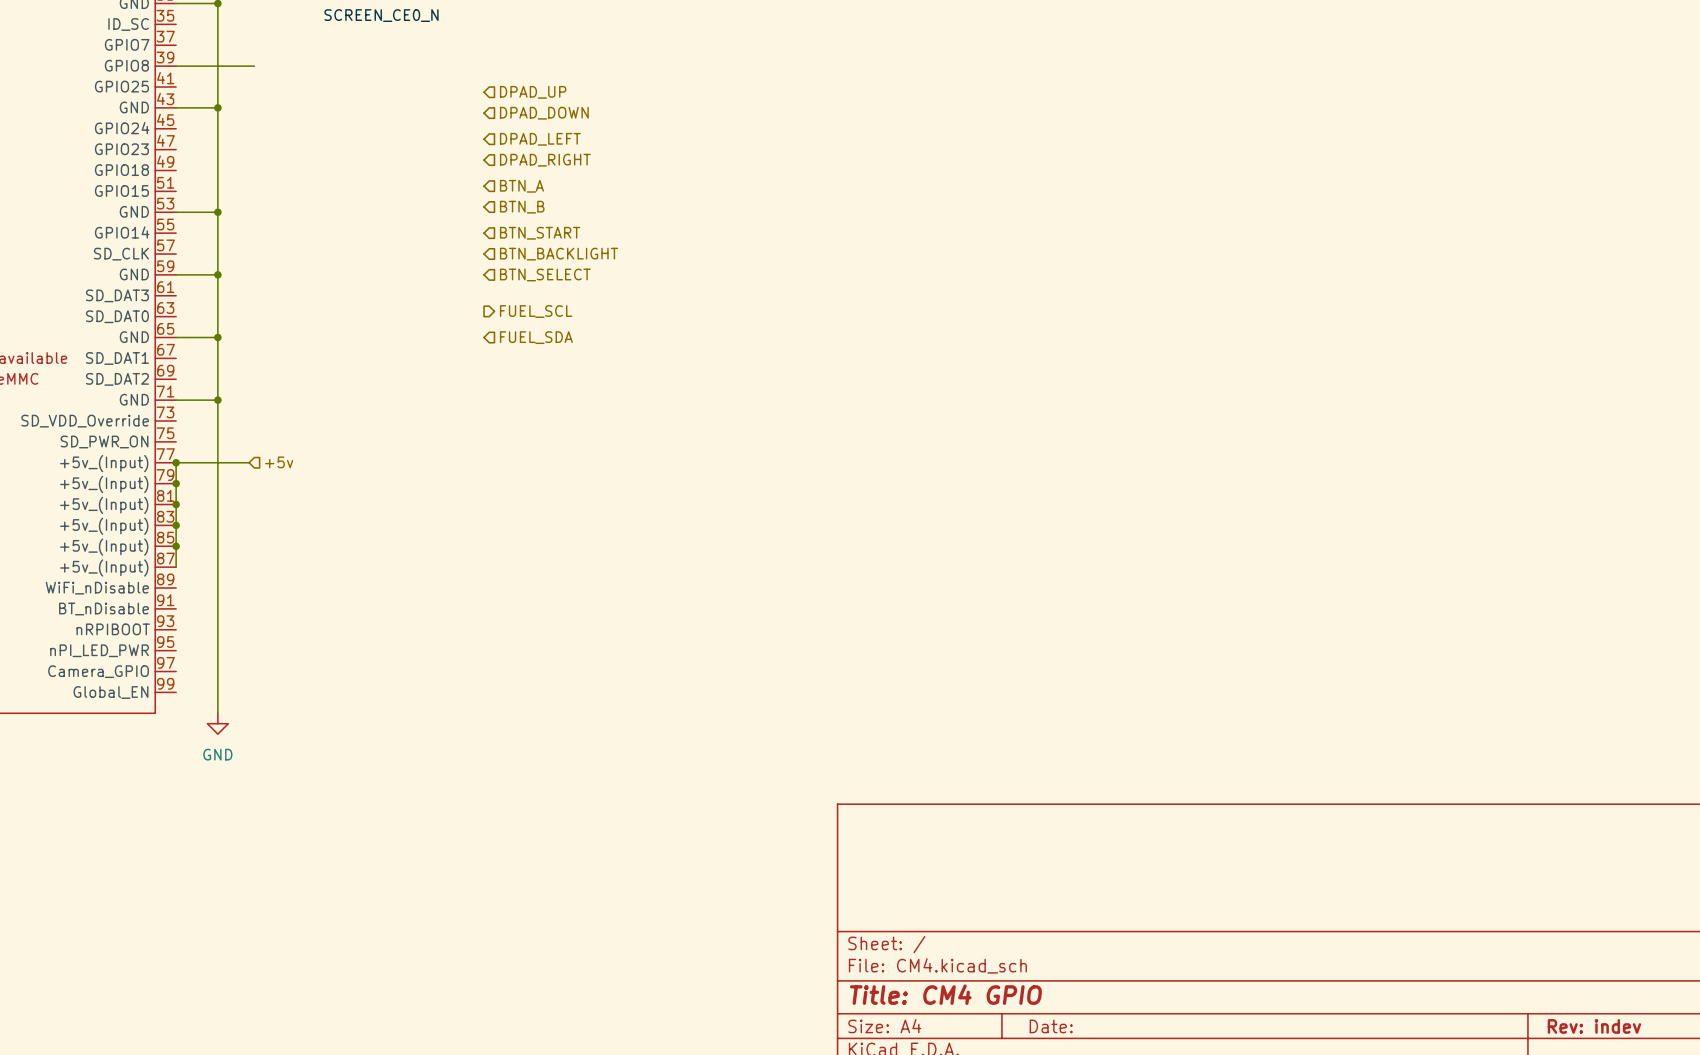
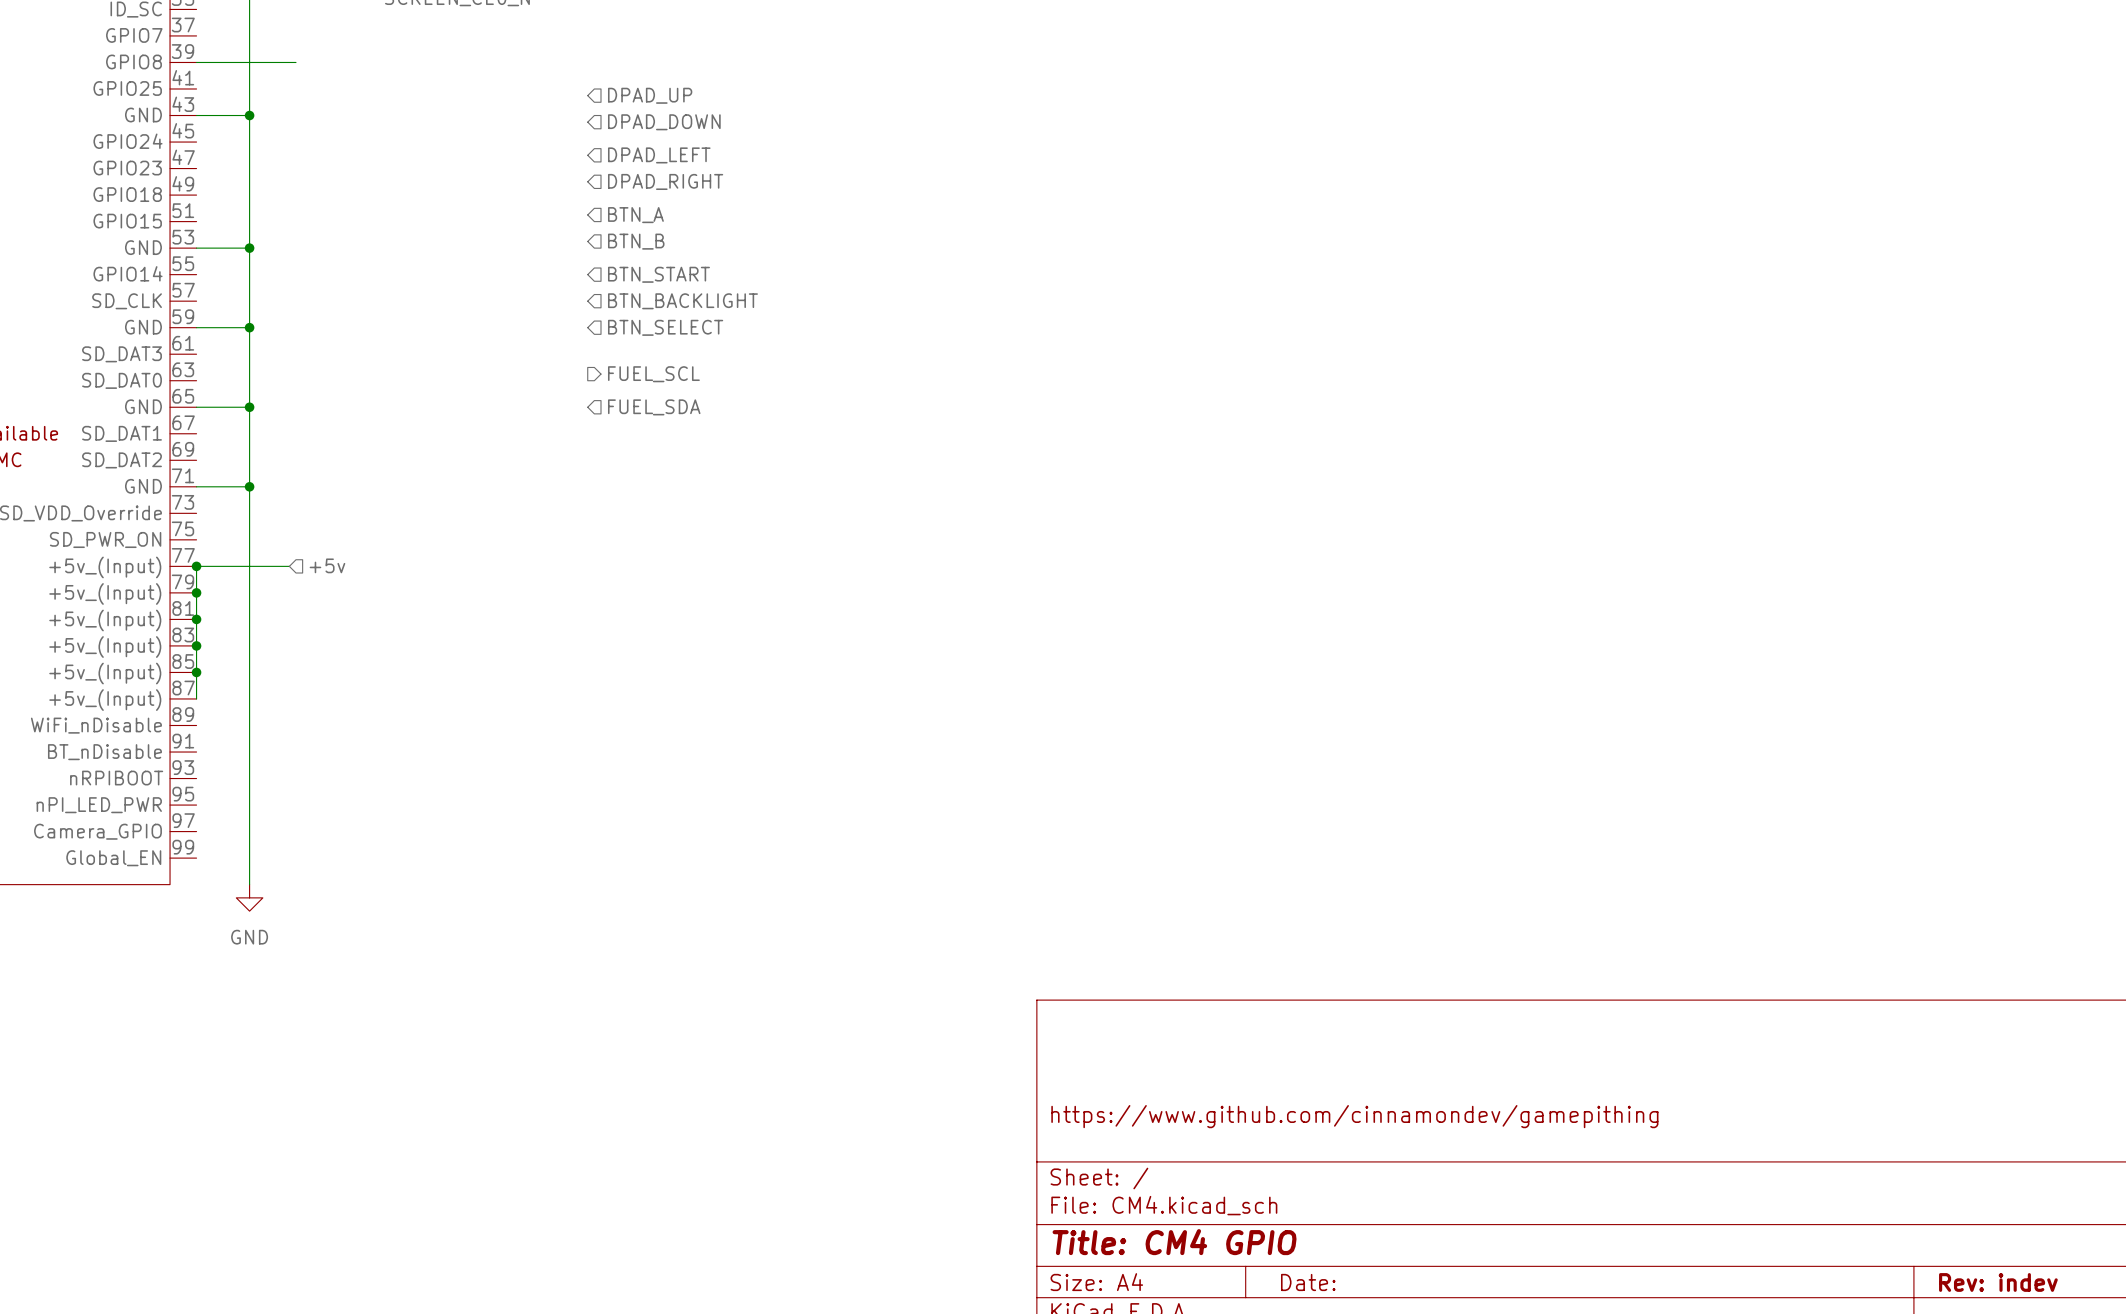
title block: none -> https://www.github.com/cinnamondev/gamepithing (1354, 1116)

